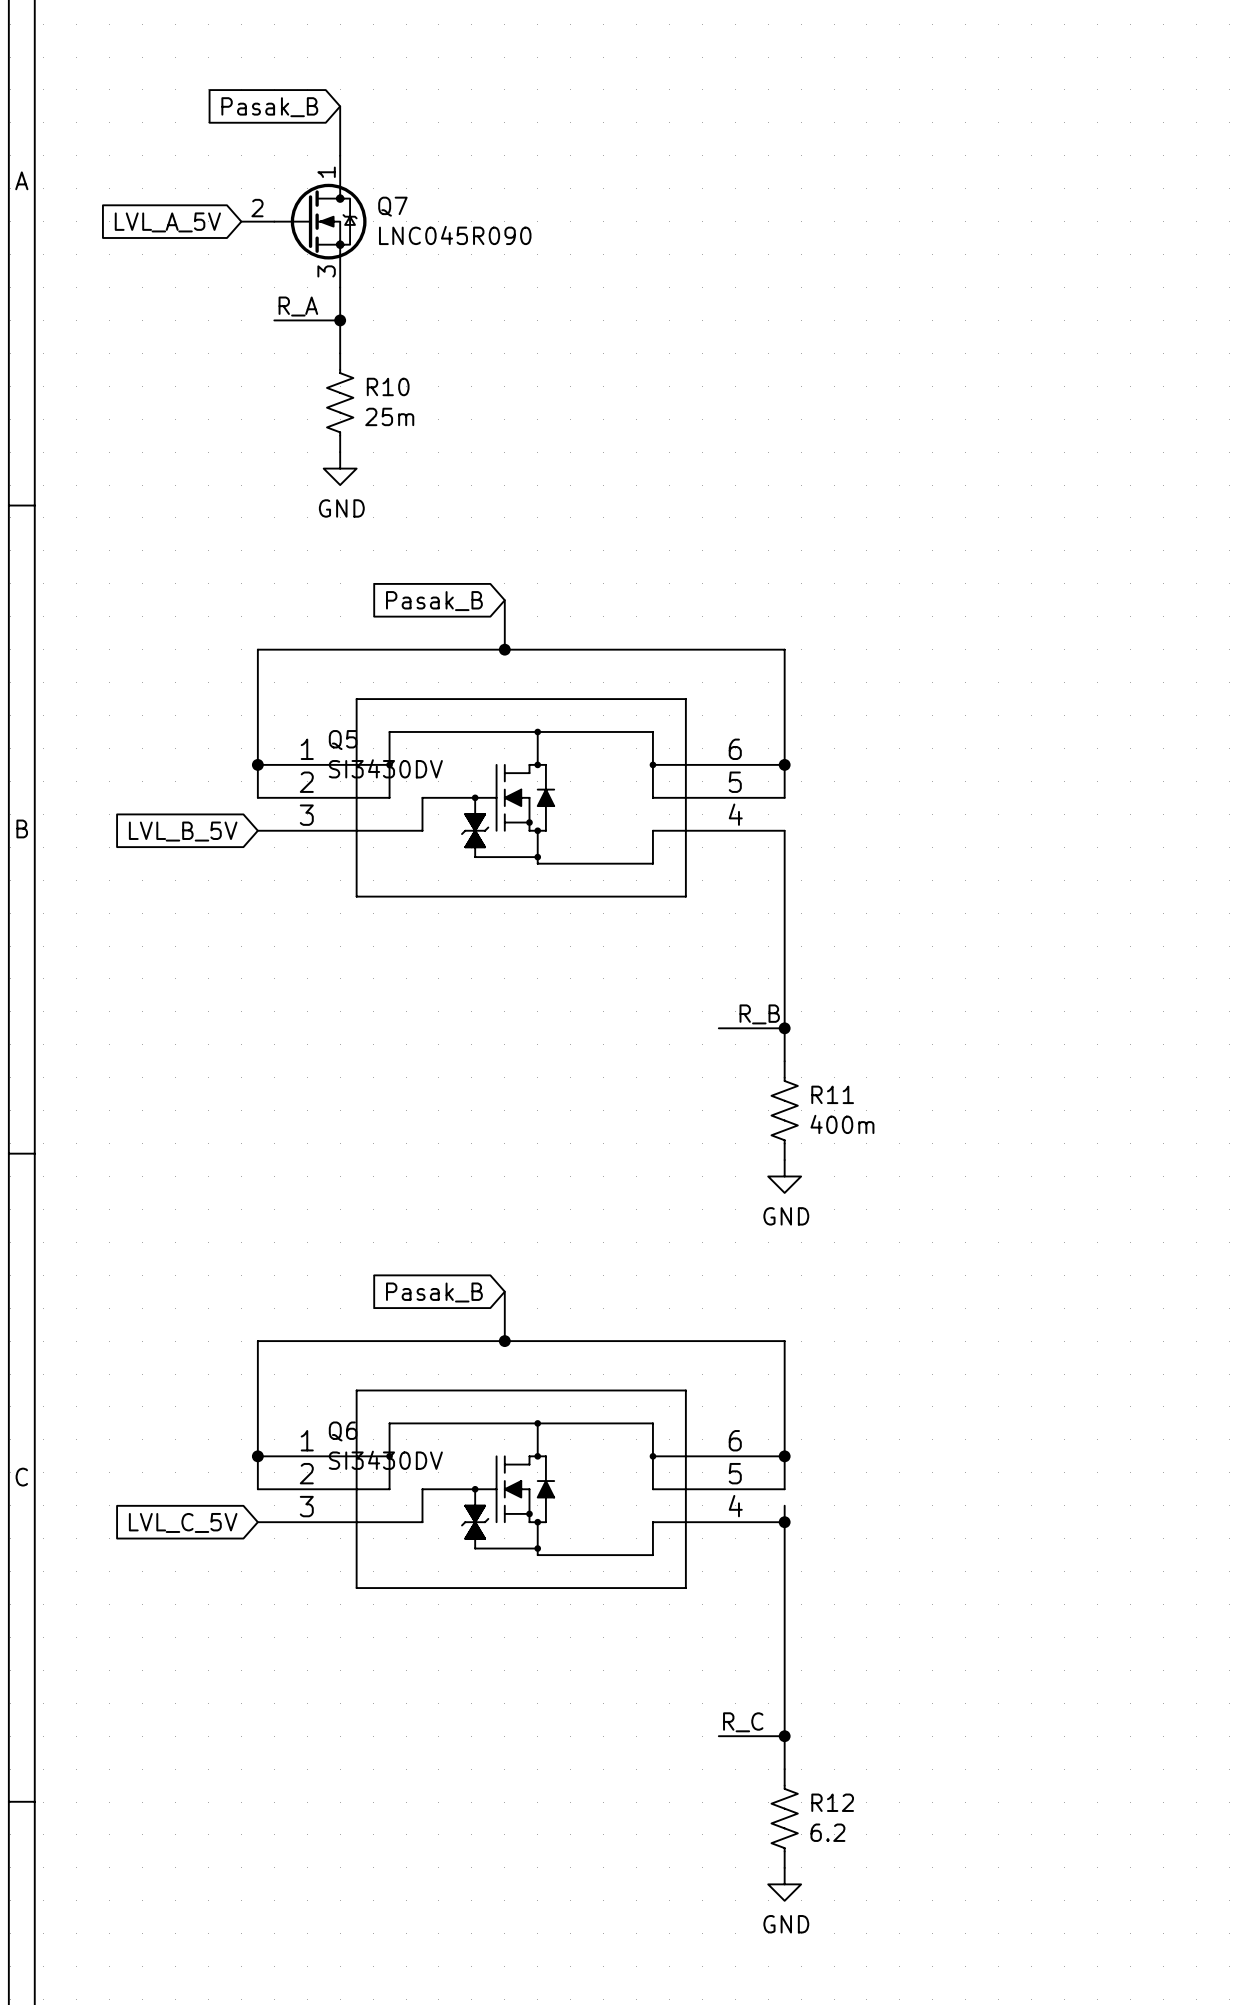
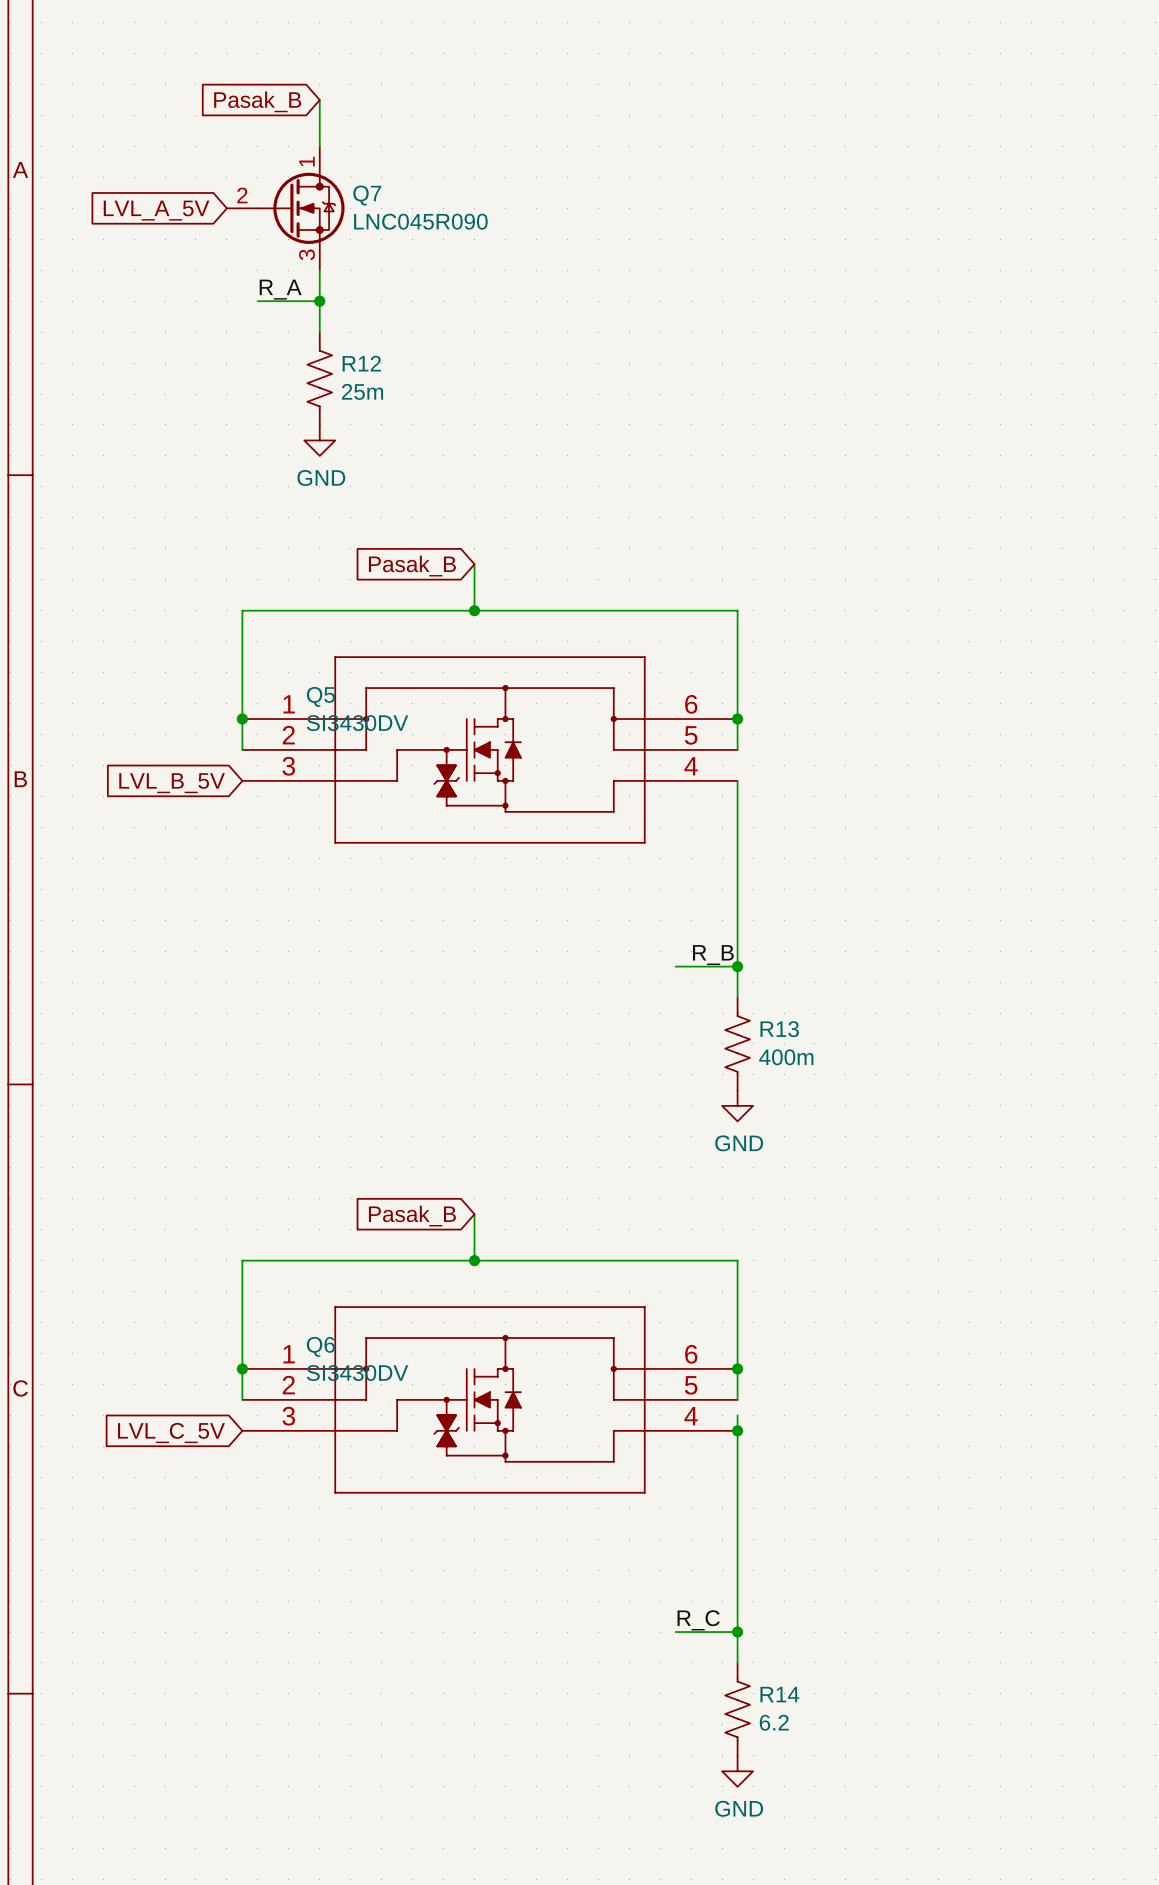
R10 name: R10 (388, 386) -> R12 (361, 363)
R11 name: R11 (832, 1094) -> R13 (779, 1029)
R12 name: R12 (832, 1802) -> R14 (779, 1694)

